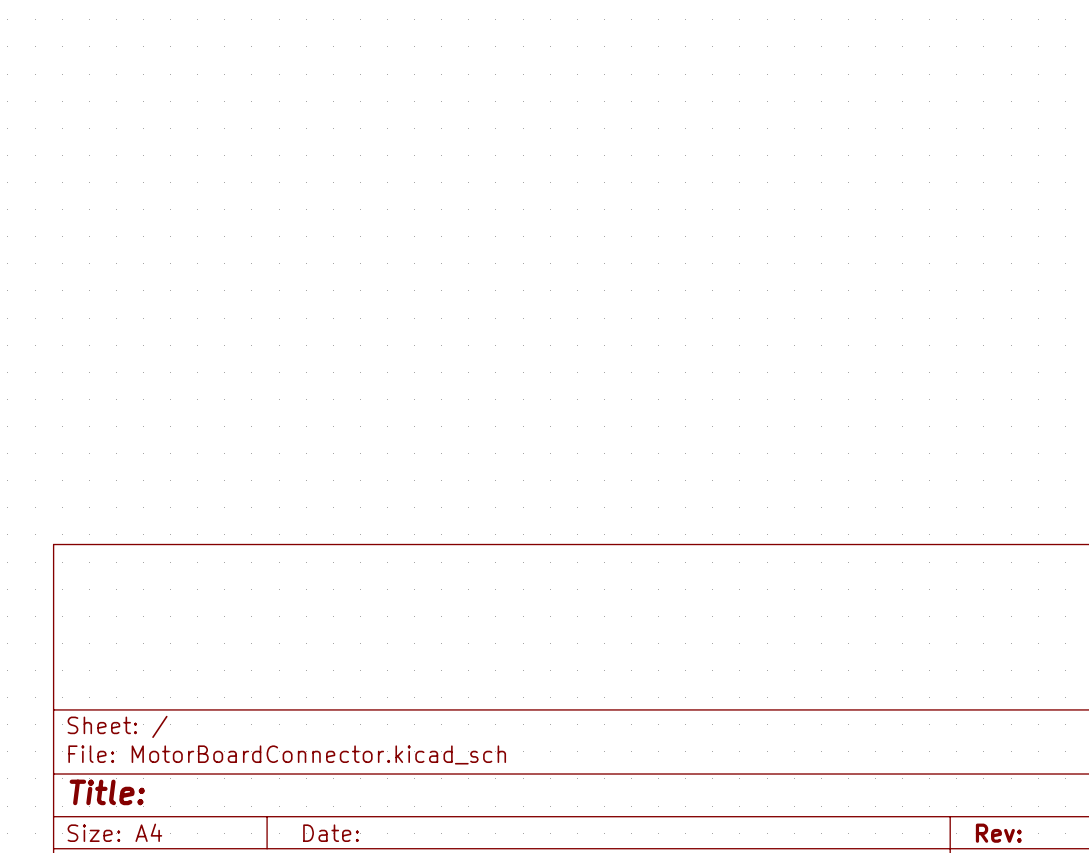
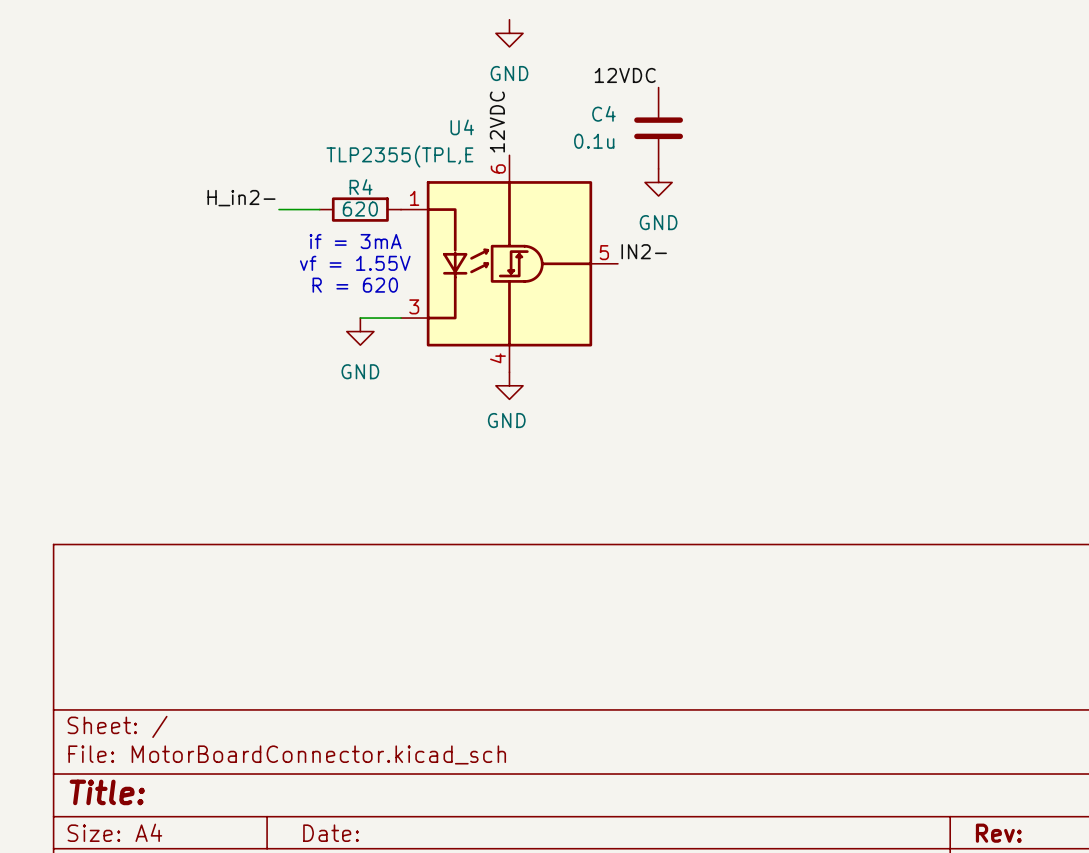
power symbol: none -> GND (509, 33)
label: none -> 12VDC (625, 75)
label: none -> 12VDC (497, 122)
C4: none -> 0.1u (658, 128)
power symbol: none -> GND (658, 182)
label: none -> H_in2- (241, 198)
wire: none -> (279, 209) (319, 209)
R4: none -> 620 (360, 209)
text: none -> if = 3mA (355, 241)
label: none -> IN2- (644, 251)
text: none -> vf = 1.55V (355, 263)
U4: none -> TLP2355(TPL,E (509, 263)
text: none -> R = 620 (355, 285)
wire: none -> (360, 318) (401, 318)
power symbol: none -> GND (360, 331)
power symbol: none -> GND (509, 385)

